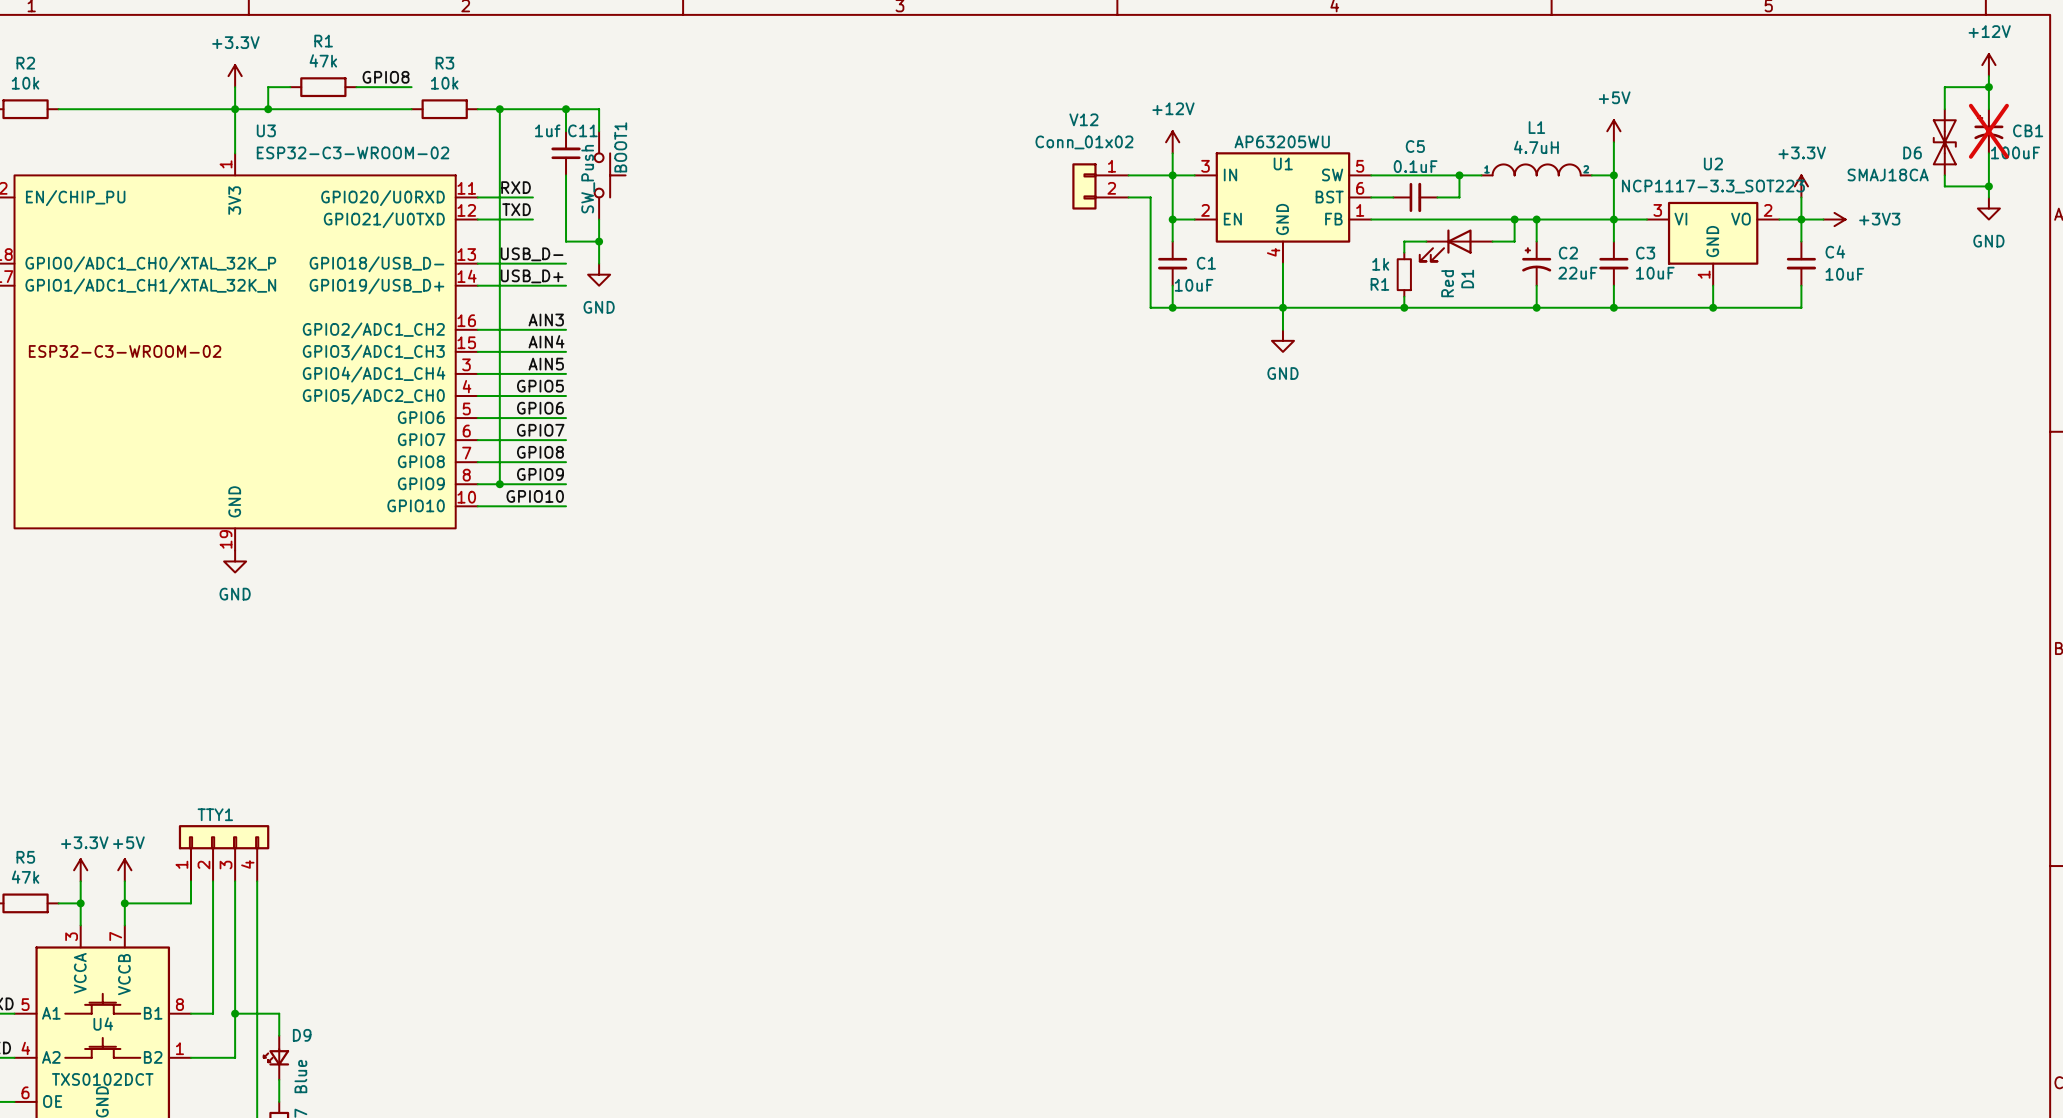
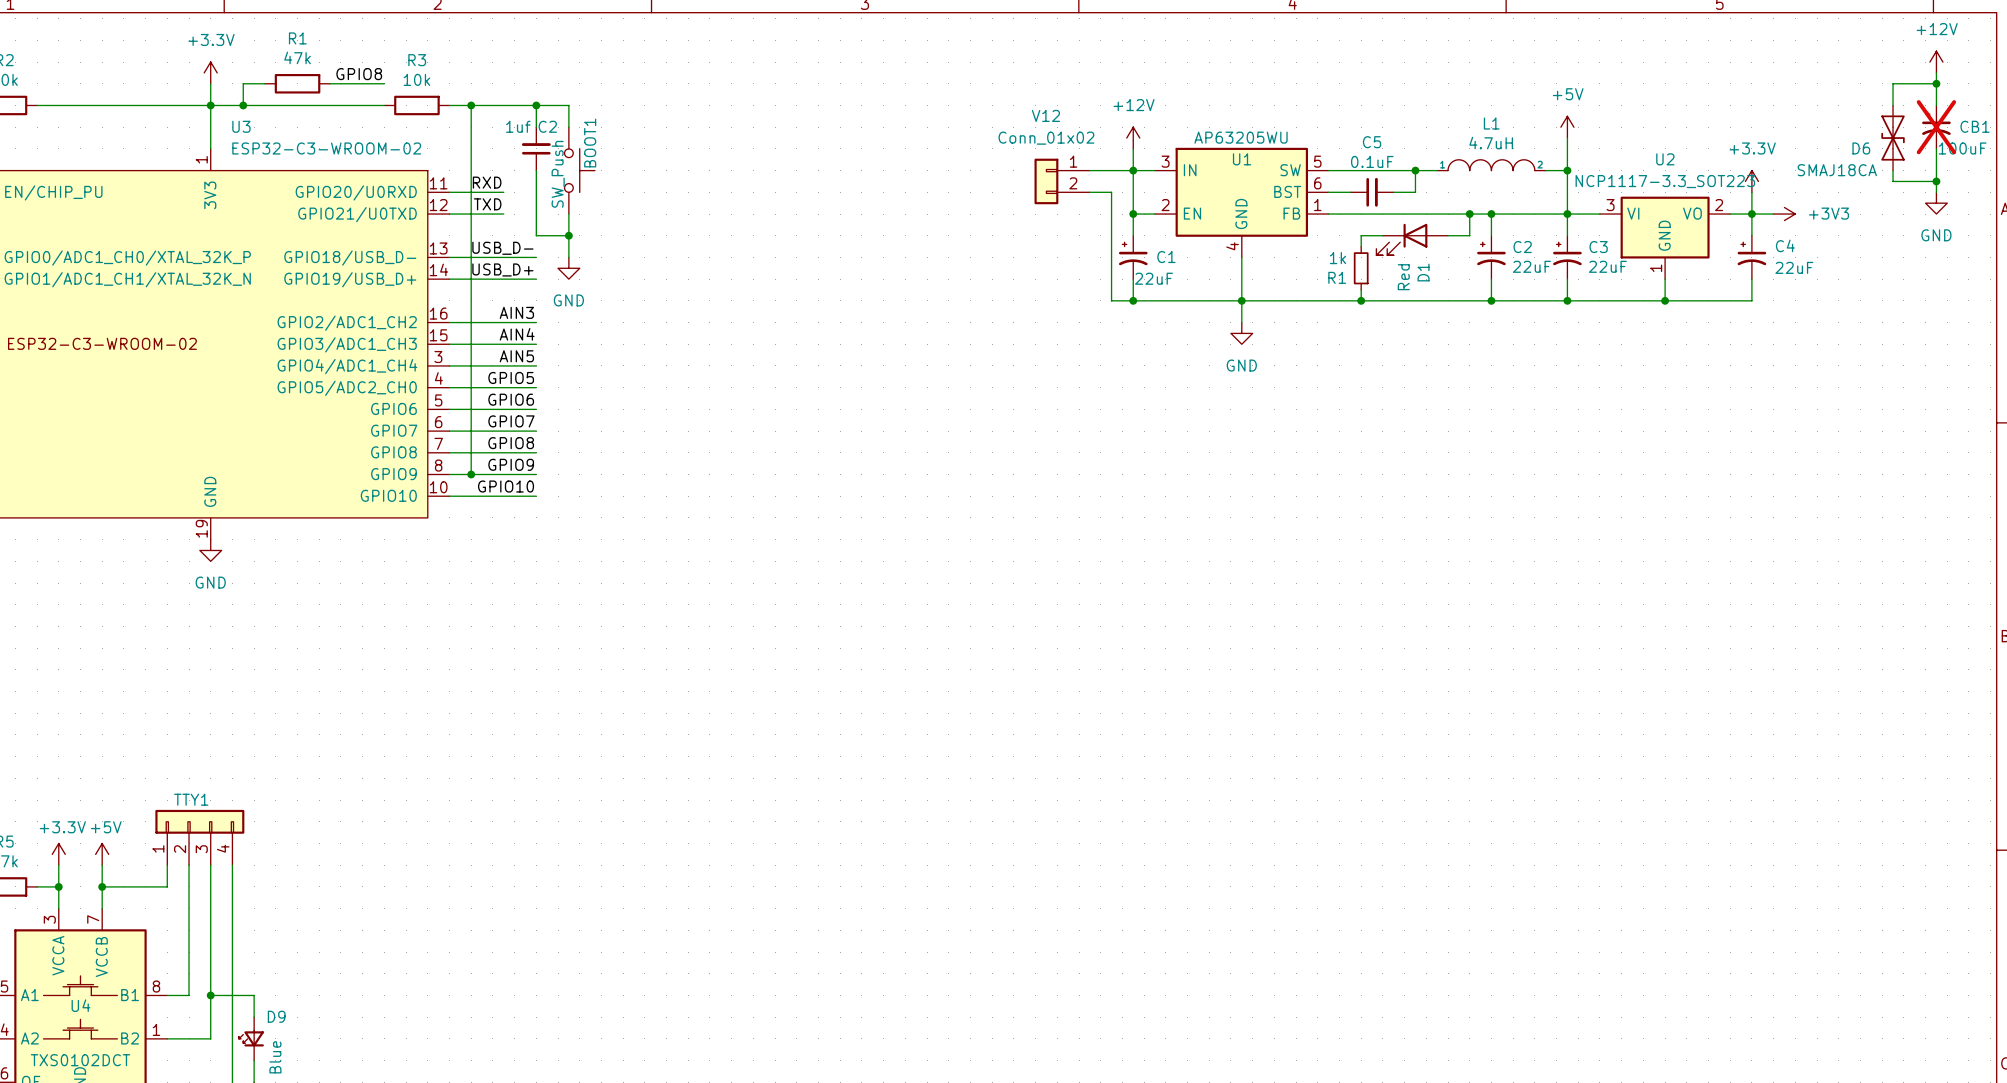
C11 name: C11 (582, 130) -> C2 (547, 126)
C1 symbol: [1158, 241, 1188, 286] -> [1118, 235, 1148, 280]
C3 symbol: [1599, 241, 1629, 286] -> [1553, 235, 1582, 280]
C4 symbol: [1786, 241, 1817, 286] -> [1737, 235, 1767, 280]
C3 value: 10uF (1655, 273) -> 22uF (1607, 266)
C4 value: 10uF (1844, 274) -> 22uF (1794, 267)
C1 value: 10uF (1194, 285) -> 22uF (1154, 278)

